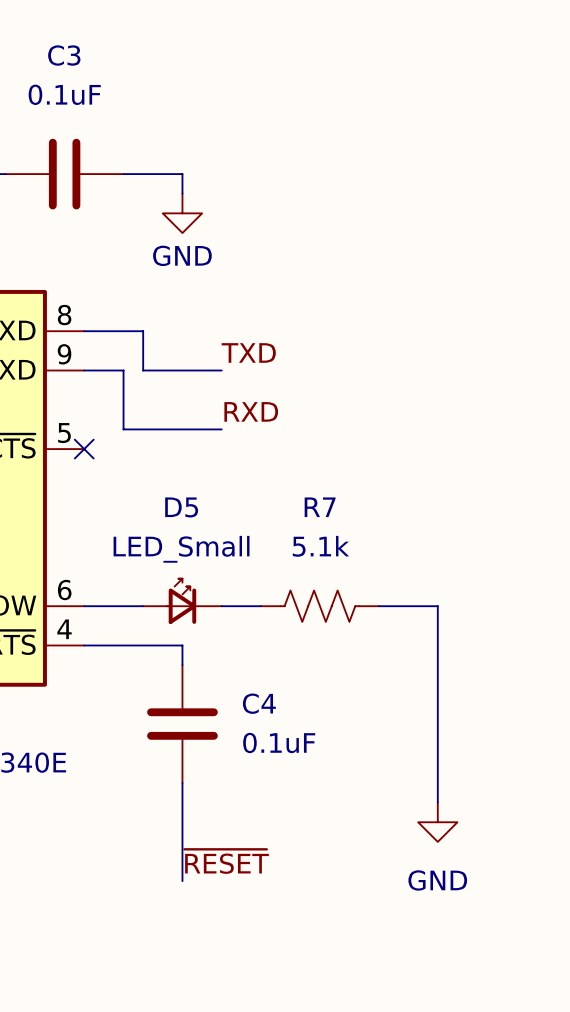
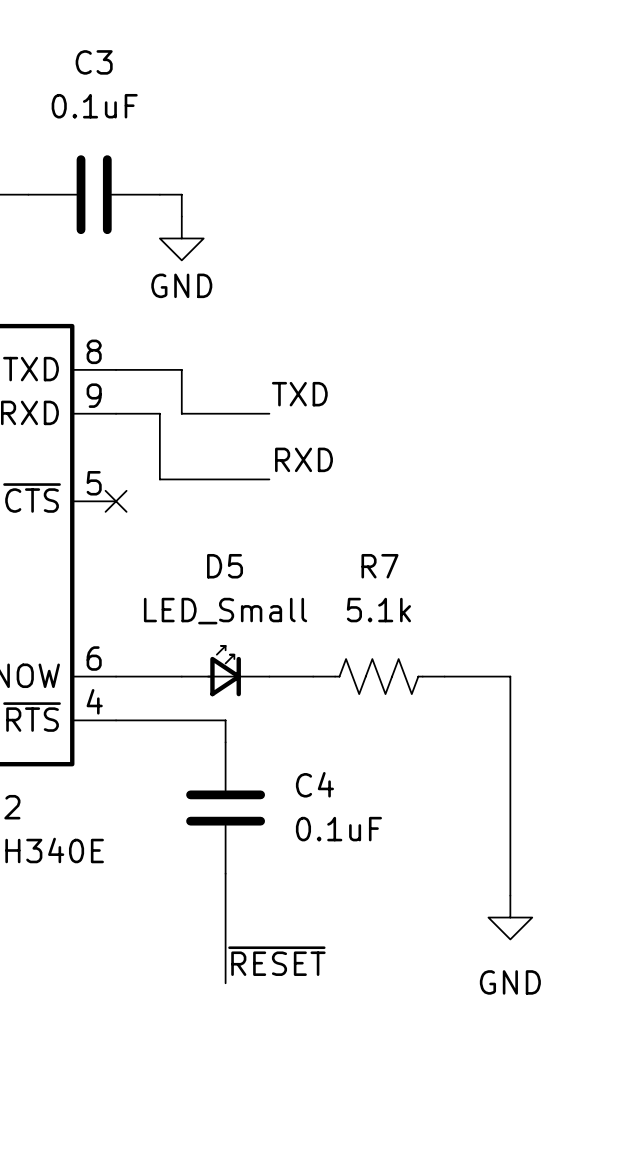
wire: (143, 174) (182, 174) (182, 193) -> (181, 194) (181, 216)
power symbol position: GND (182, 213) -> GND (181, 238)

